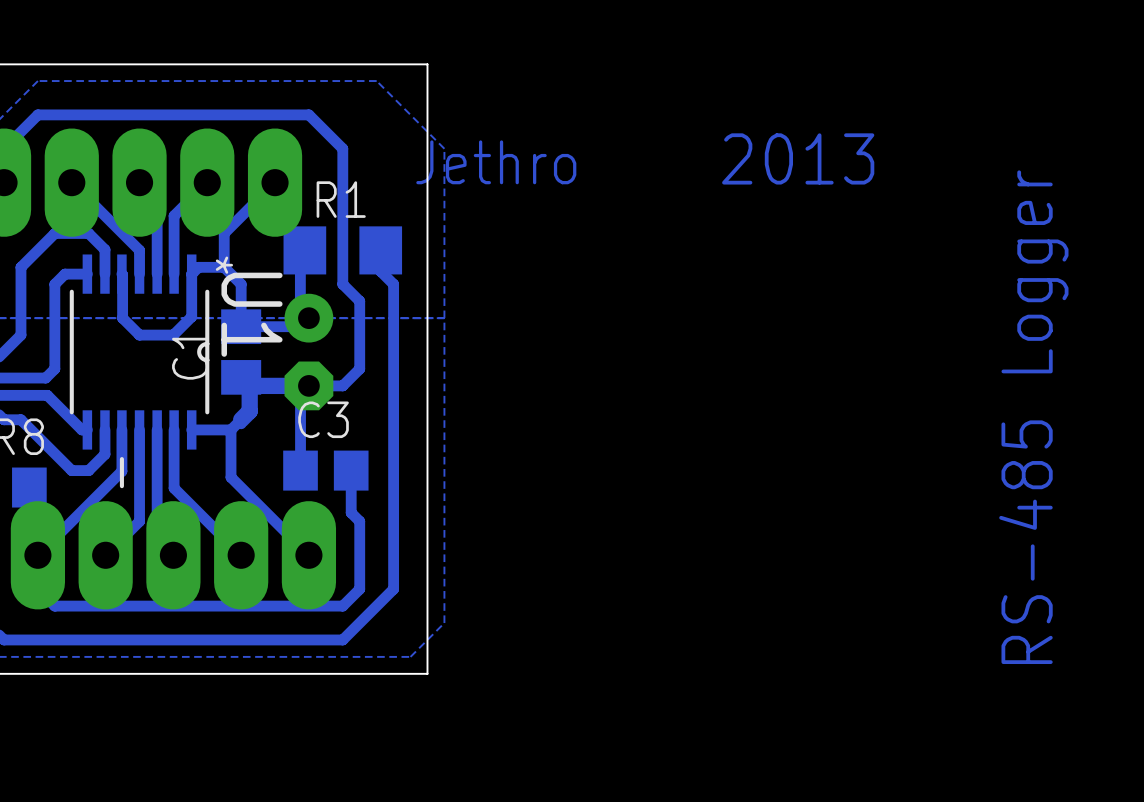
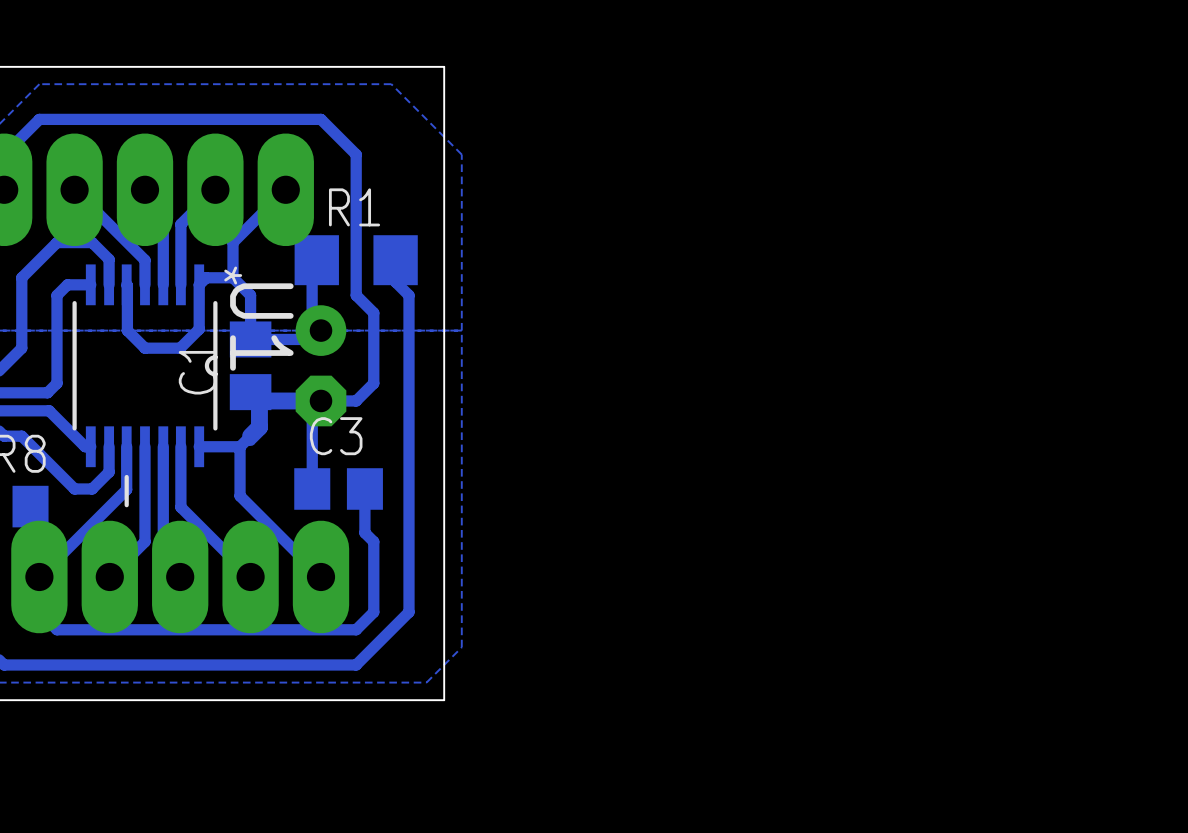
text: 2013 (798, 158) -> none
text: Jethro (496, 162) -> none
text: RS-485 Logger (1033, 417) -> none

